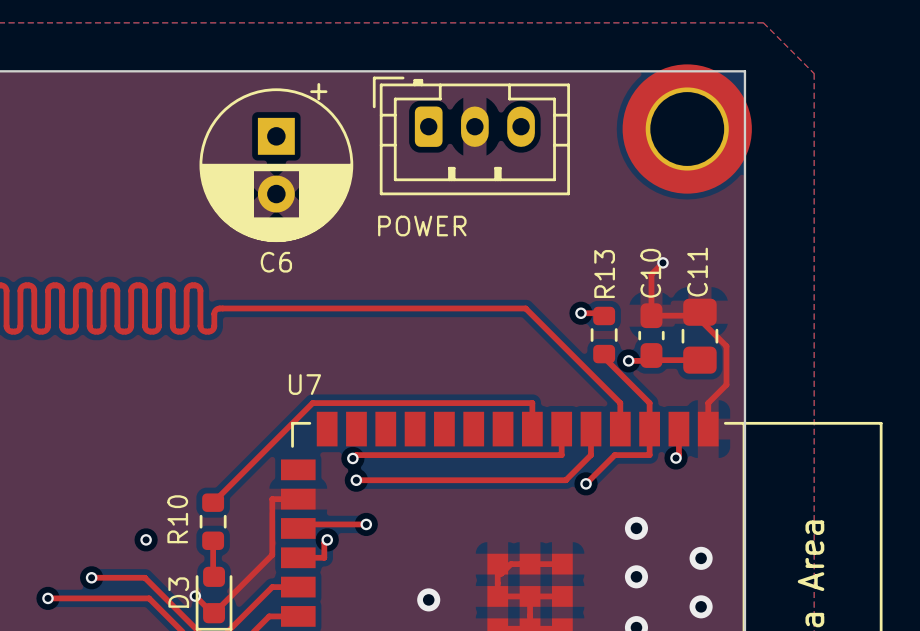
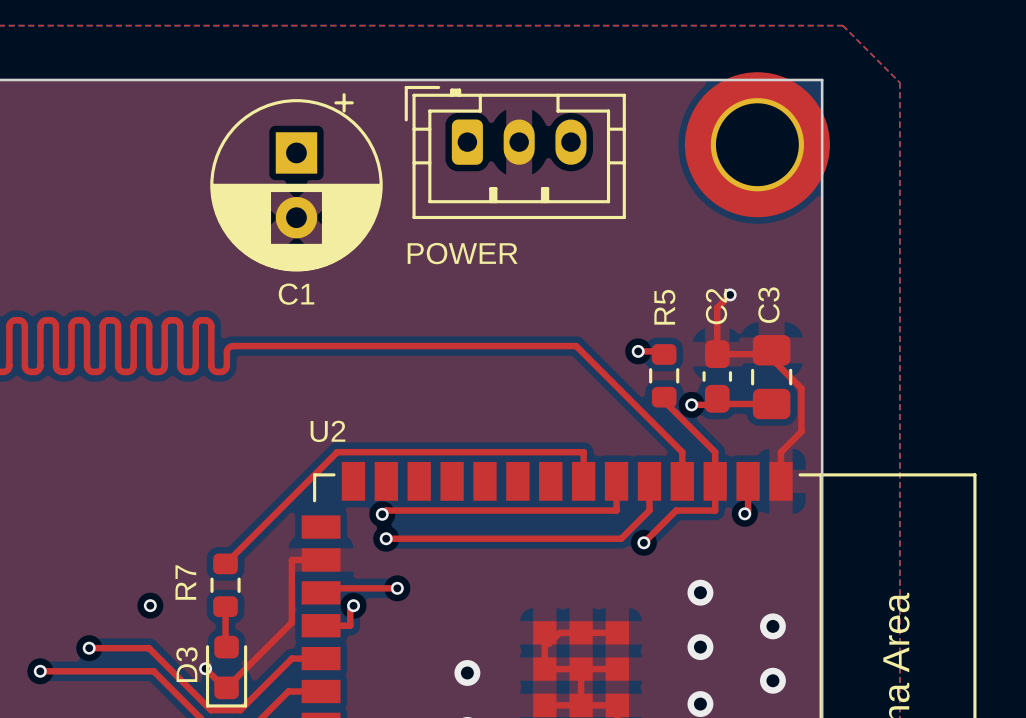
C6 name: C6 (276, 262) -> C1 (296, 294)
C11 name: C11 (697, 272) -> C3 (768, 305)
R13 name: R13 (604, 273) -> R5 (664, 307)
C10 name: C10 (650, 273) -> C2 (716, 306)
U7 name: U7 (304, 384) -> U2 (327, 431)
R10 name: R10 (177, 519) -> R7 (185, 582)

